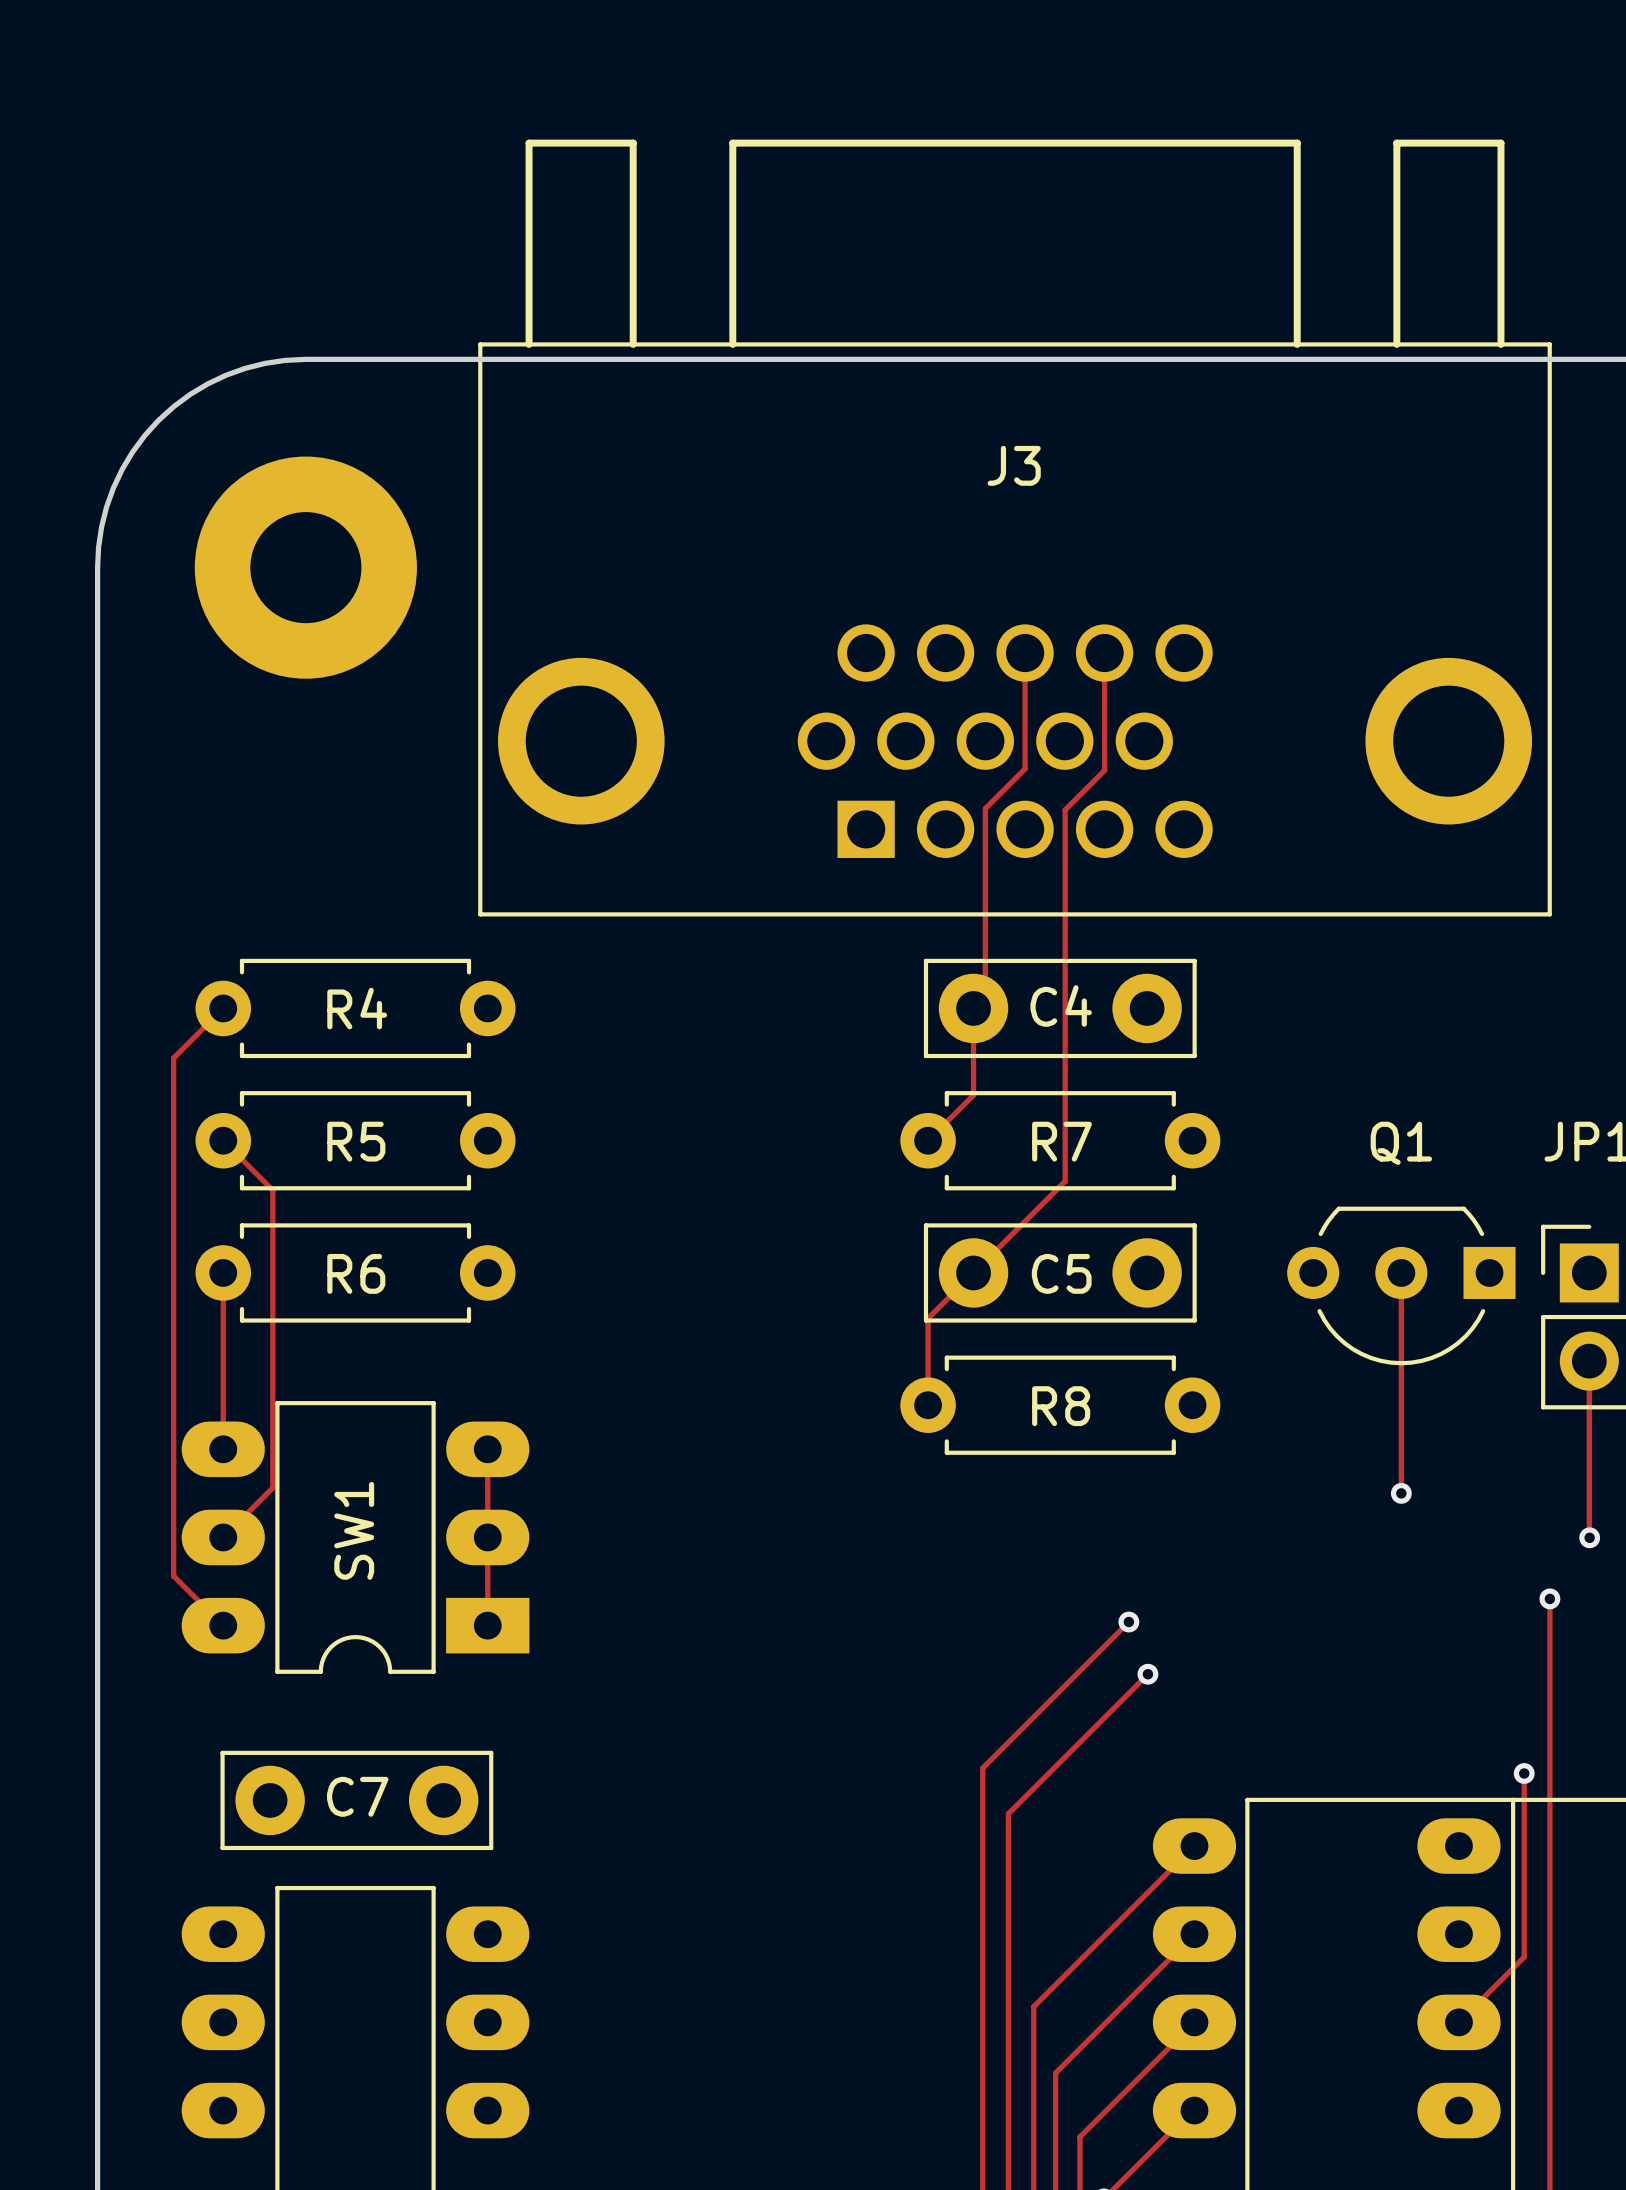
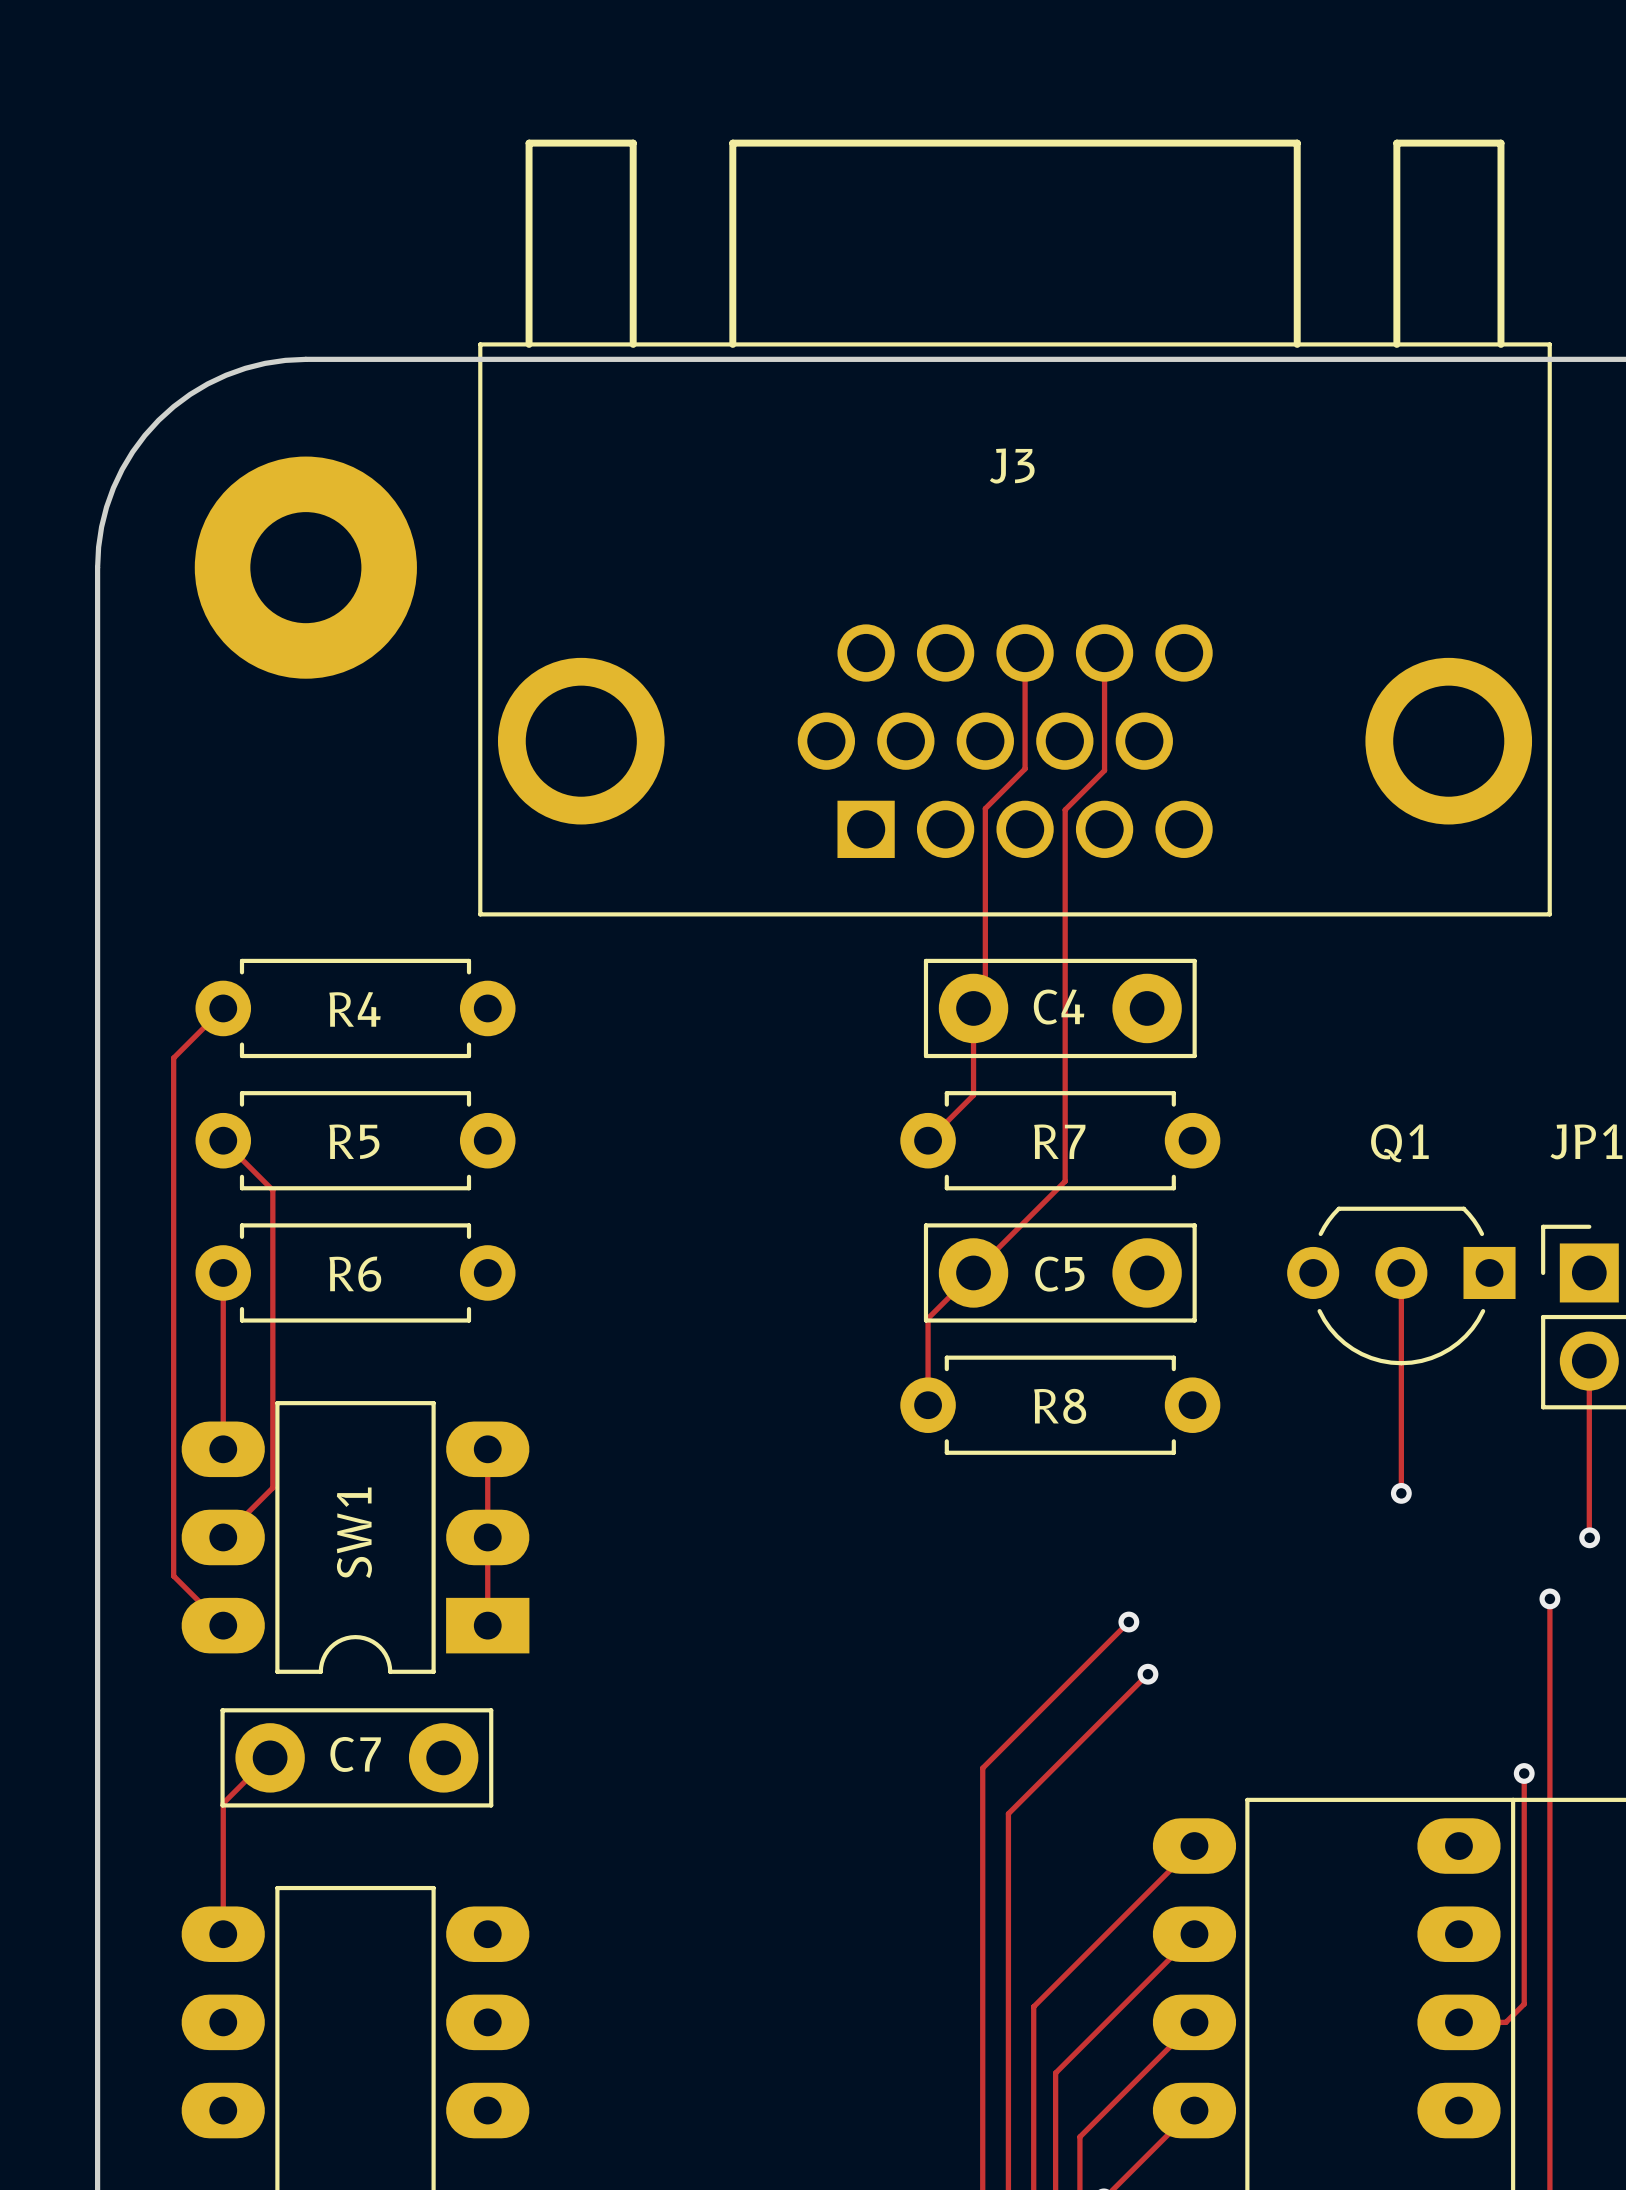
track: none -> (270, 1757) (223, 1803) (223, 1934)
C7 position: (356, 1800) -> (356, 1757)
track: (1524, 1957) (1458, 2022) -> (1524, 1957) (1524, 2004) (1505, 2022) (1458, 2022)

